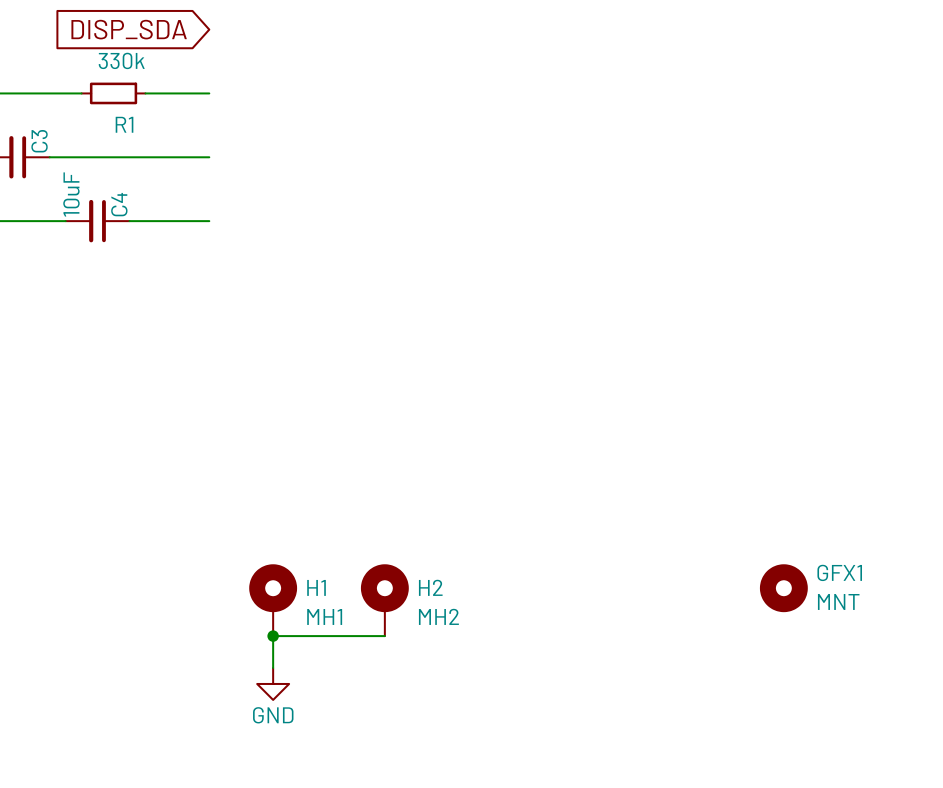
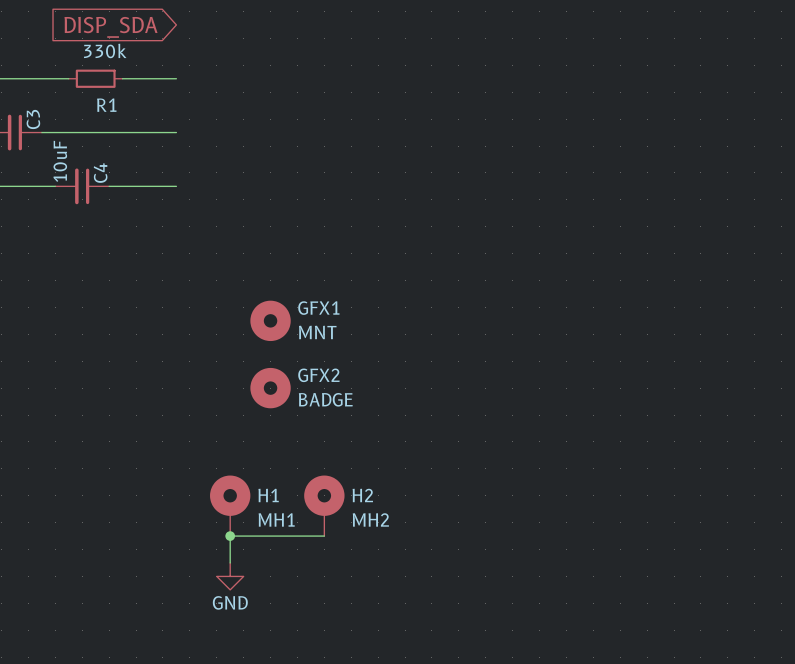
GFX2: none -> BADGE (270, 388)
GFX1 position: (783, 588) -> (270, 320)

